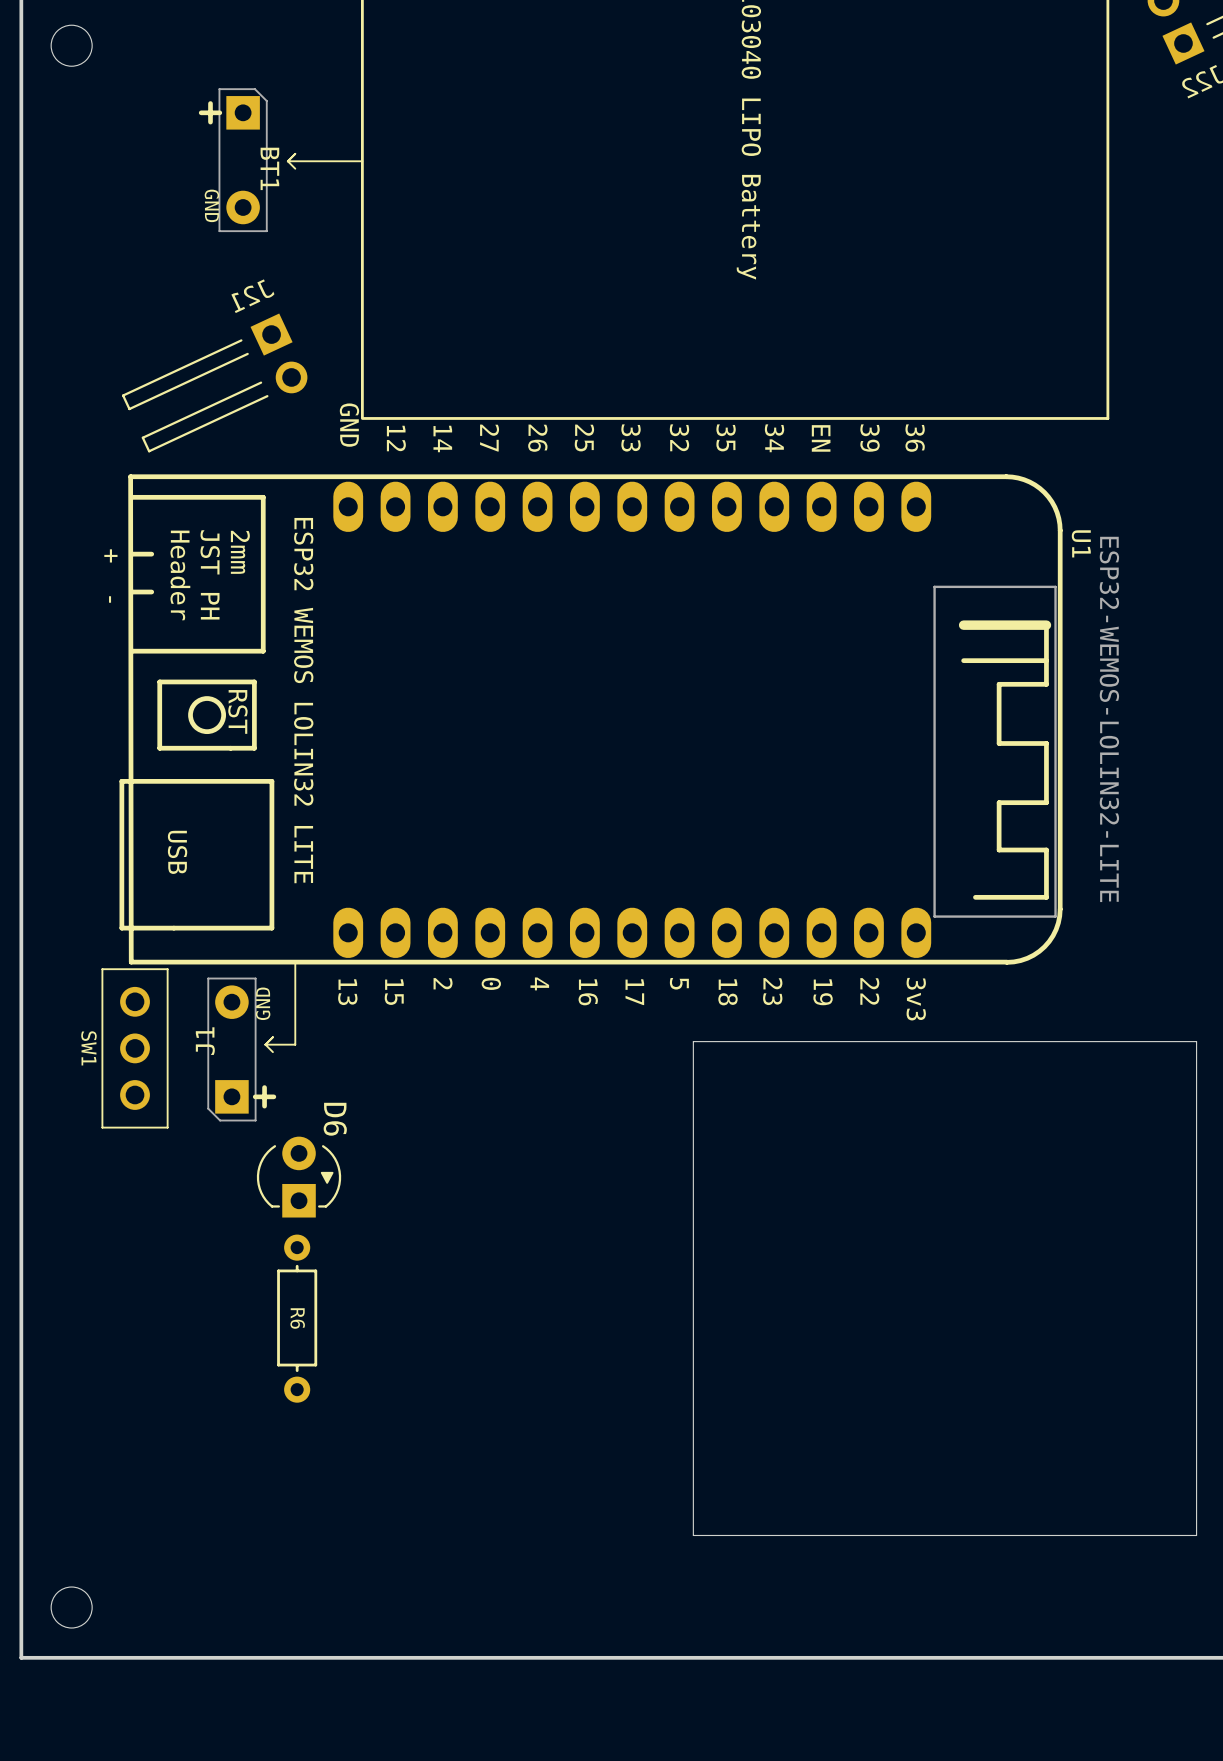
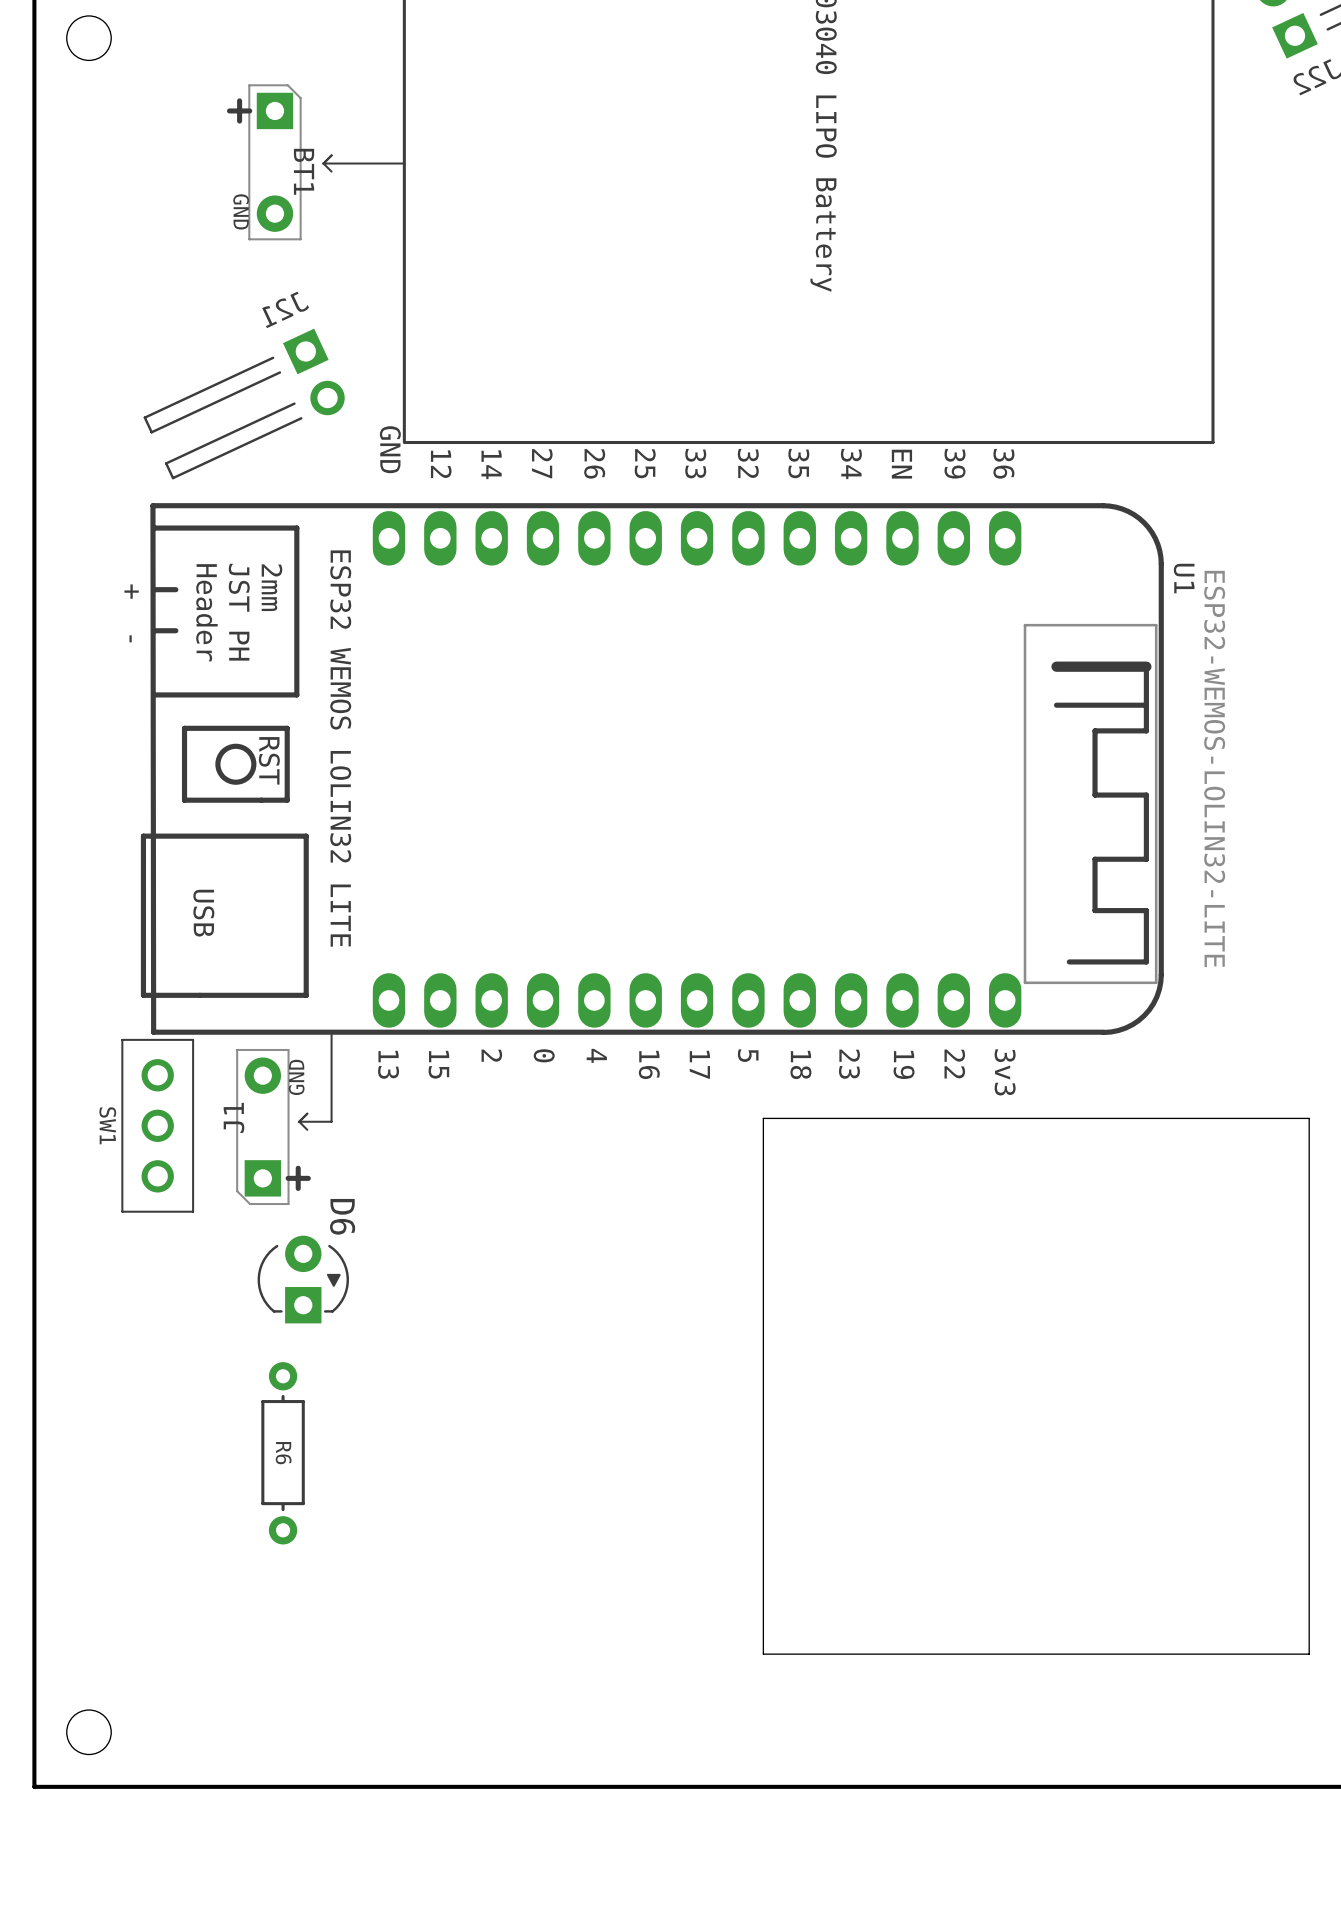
D6 position: (299, 1177) -> (303, 1279)
R6 position: (297, 1318) -> (283, 1453)

